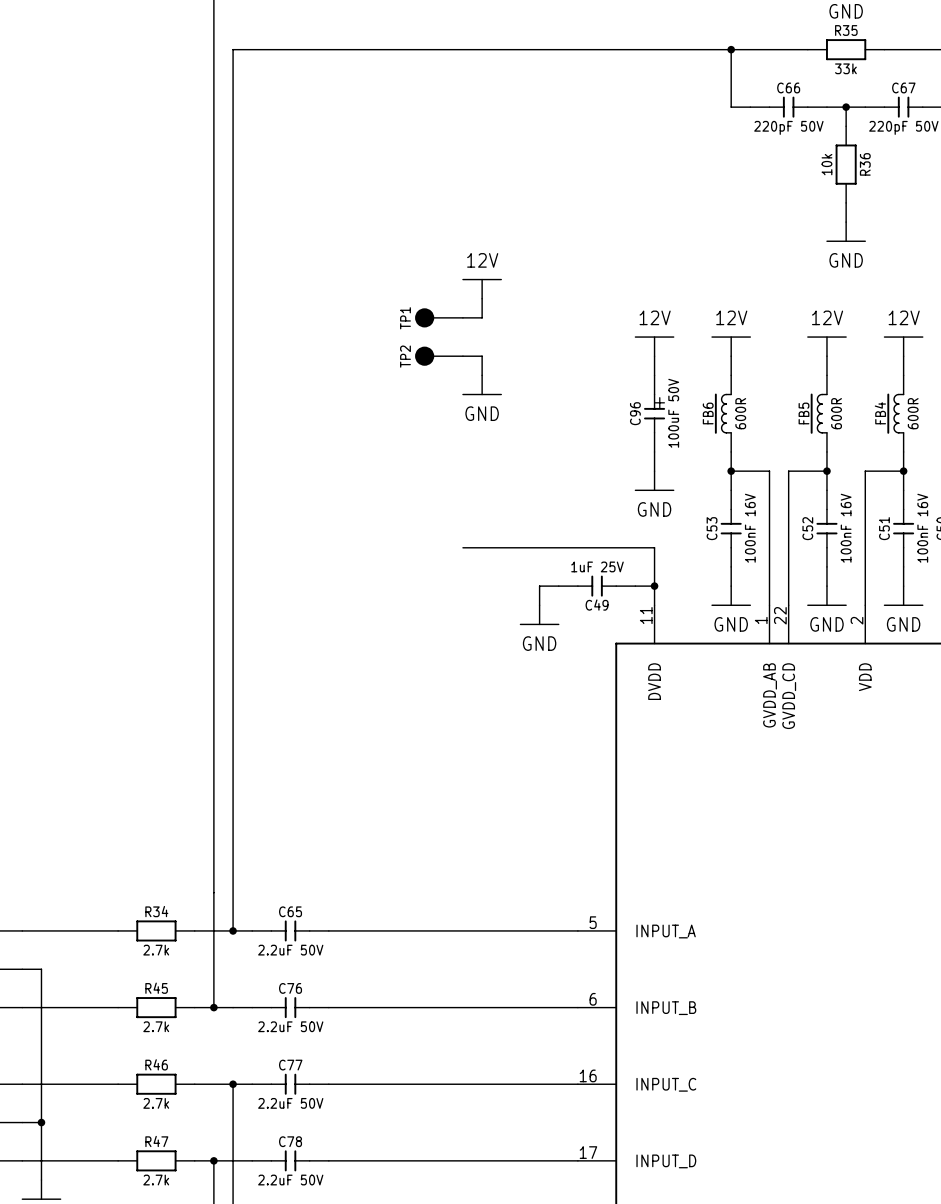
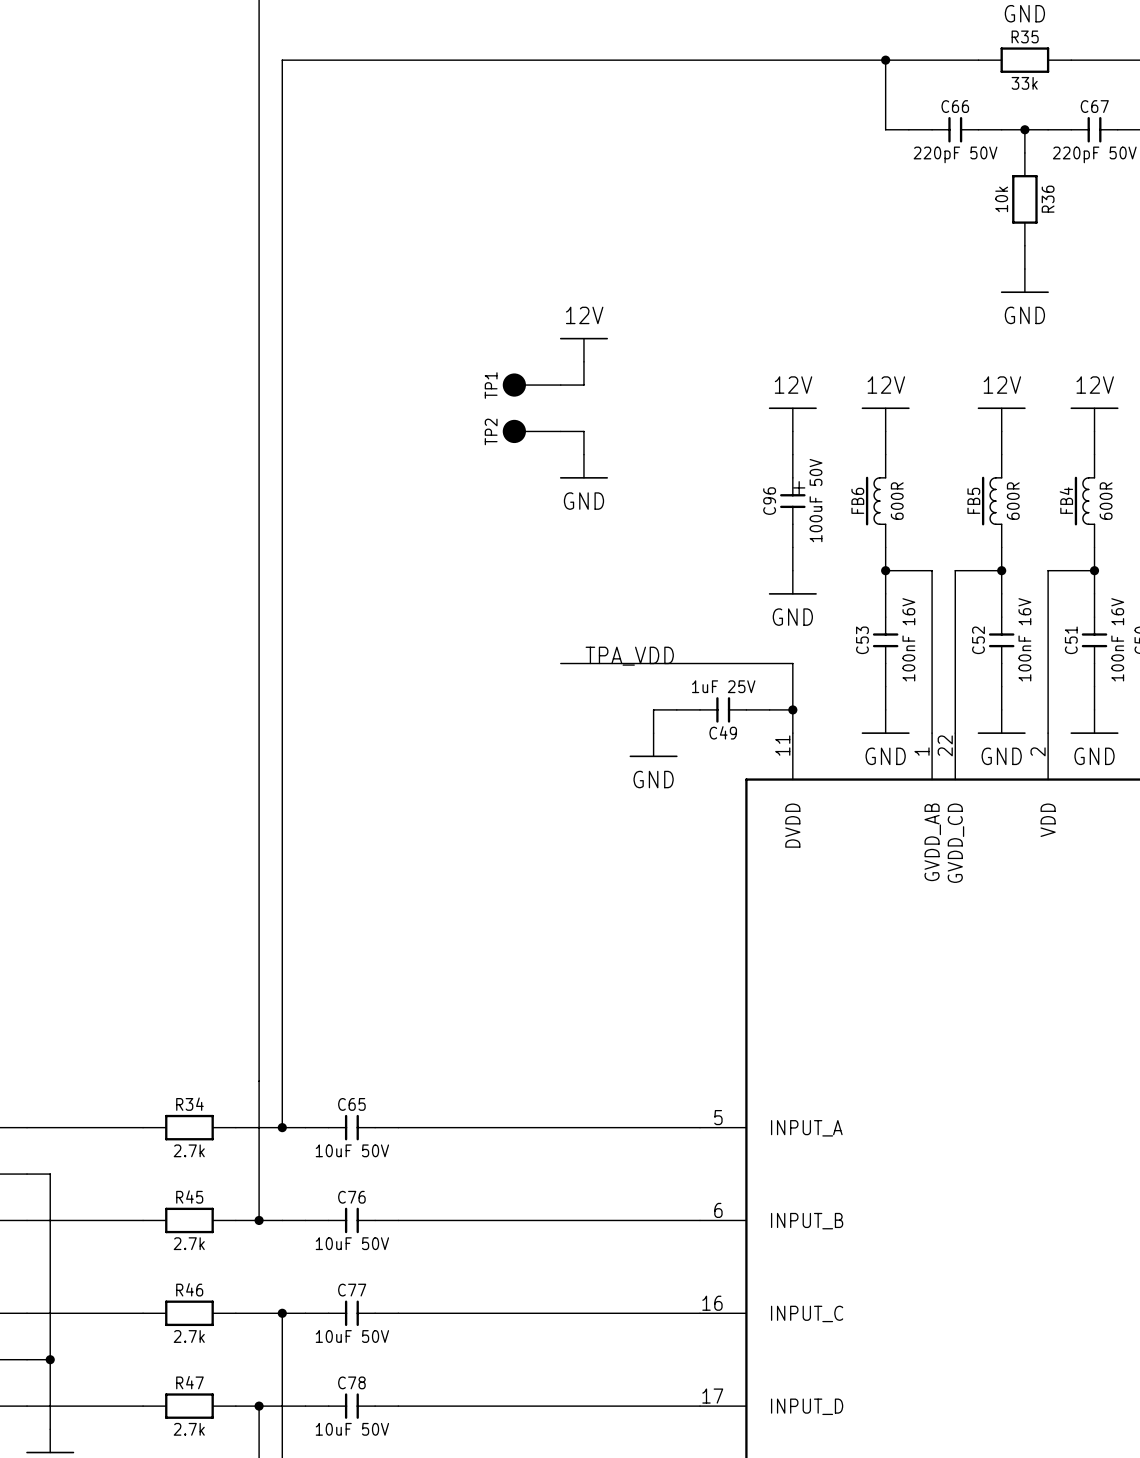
label: none -> TPA_VDD (629, 656)
C65 value: 2.2uF 50V (290, 950) -> 10uF 50V (352, 1150)
C76 value: 2.2uF 50V (290, 1026) -> 10uF 50V (352, 1243)
C77 value: 2.2uF 50V (290, 1103) -> 10uF 50V (352, 1336)
C78 value: 2.2uF 50V (290, 1180) -> 10uF 50V (352, 1429)

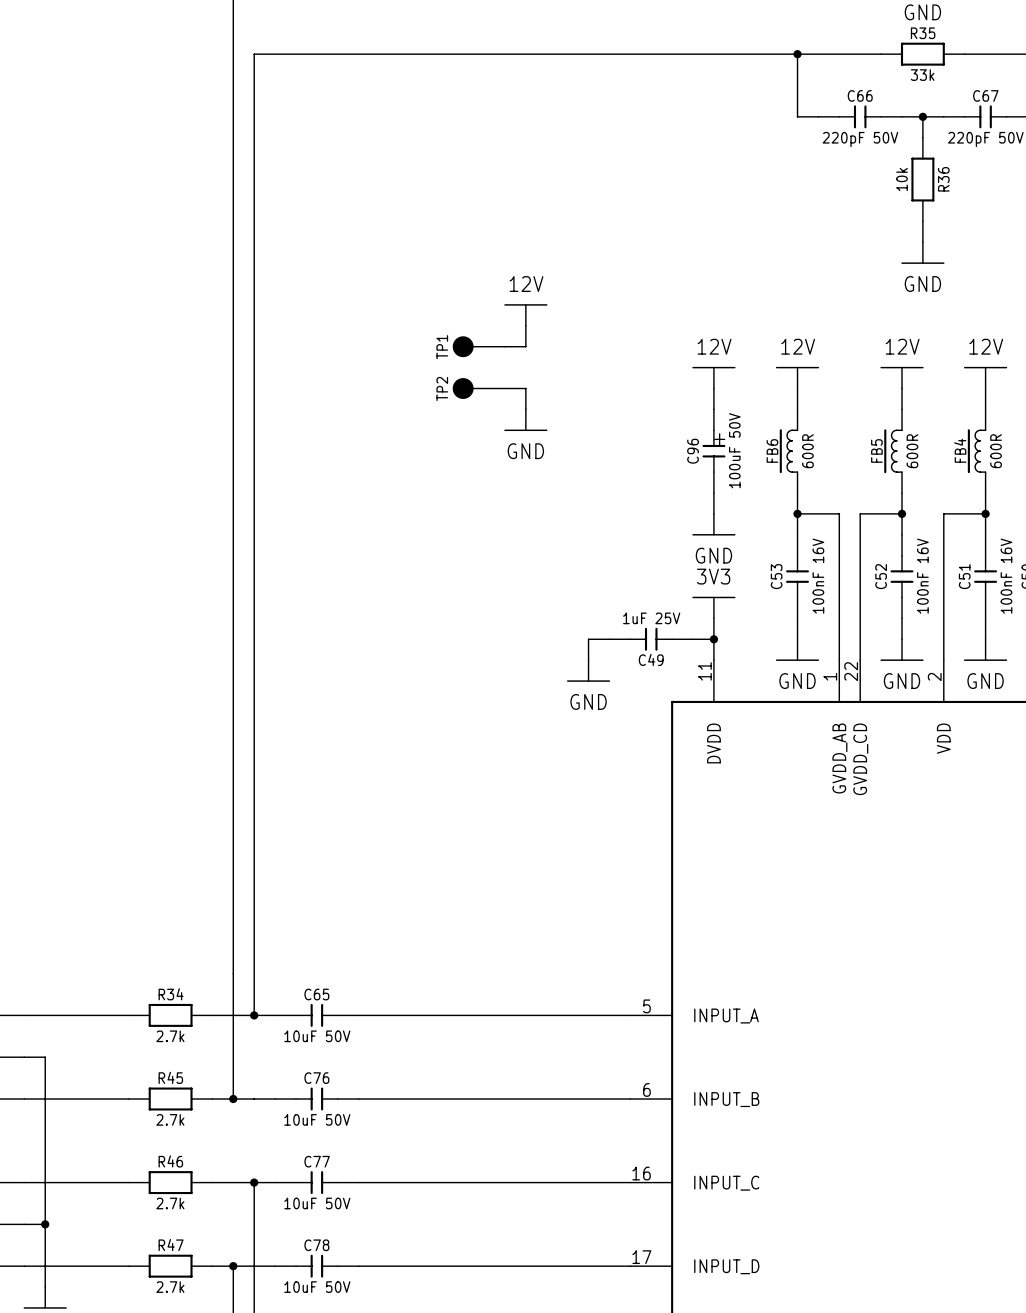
label: TPA_VDD (629, 656) -> none
wire: (560, 663) (792, 663) (792, 686) -> none
power symbol: none -> 3V3 (713, 607)

